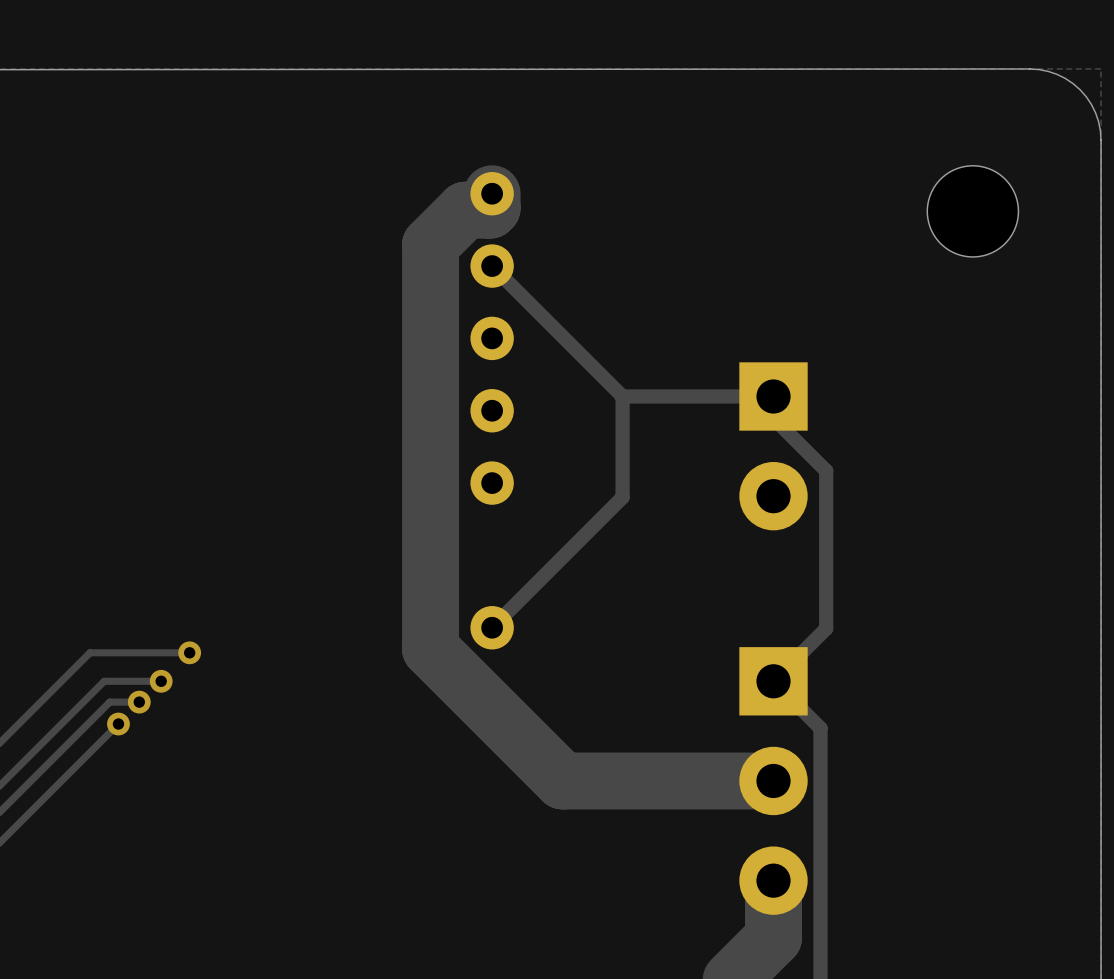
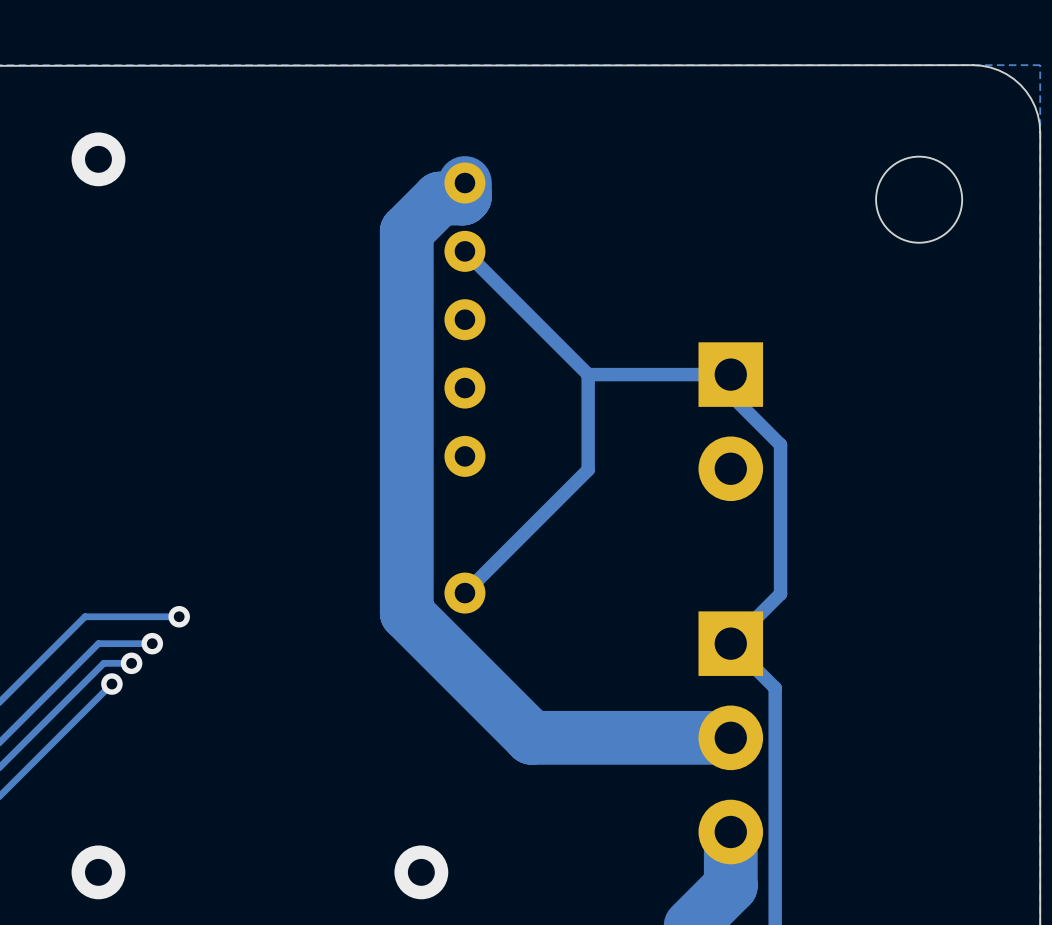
via: none -> (98, 159)
via: none -> (98, 872)
via: none -> (421, 872)

